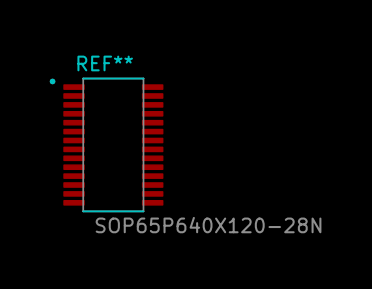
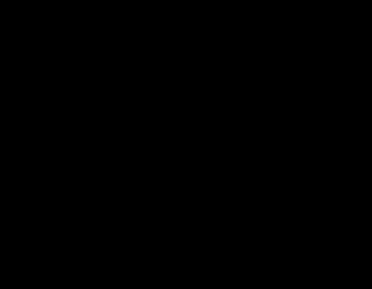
REF**: SOP65P640X120-28N (106, 144) -> none

